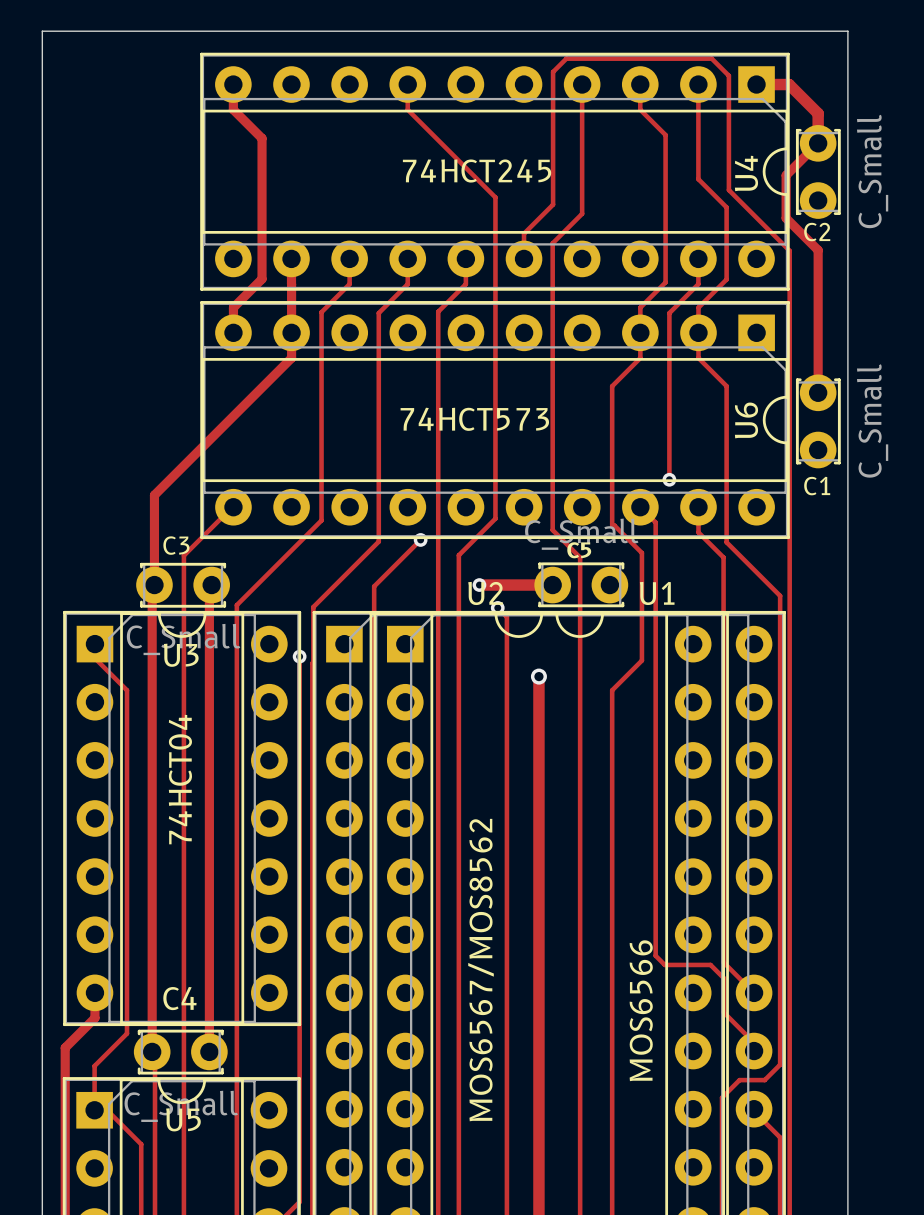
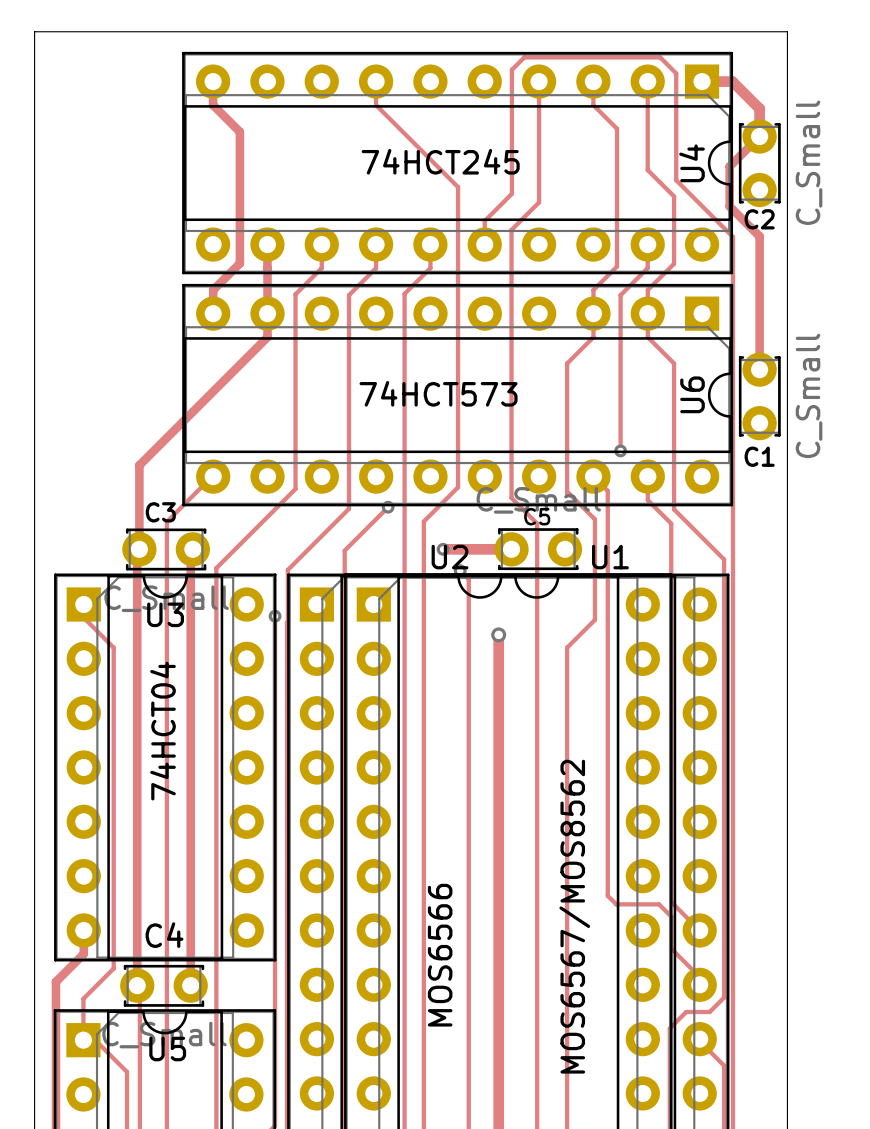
U2 value position: MOS6567/MOS8562 (481, 970) -> MOS6567/MOS8562 (574, 916)
U1 value position: MOS6566 (641, 1010) -> MOS6566 (440, 955)

